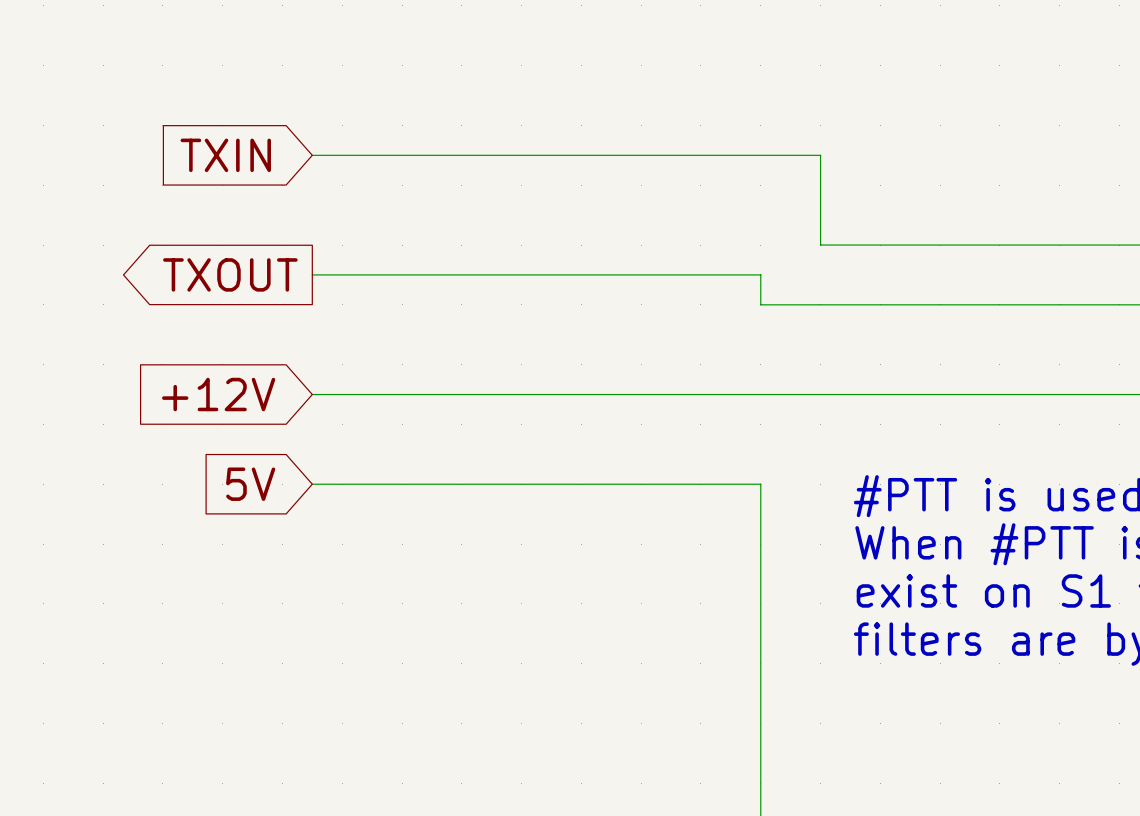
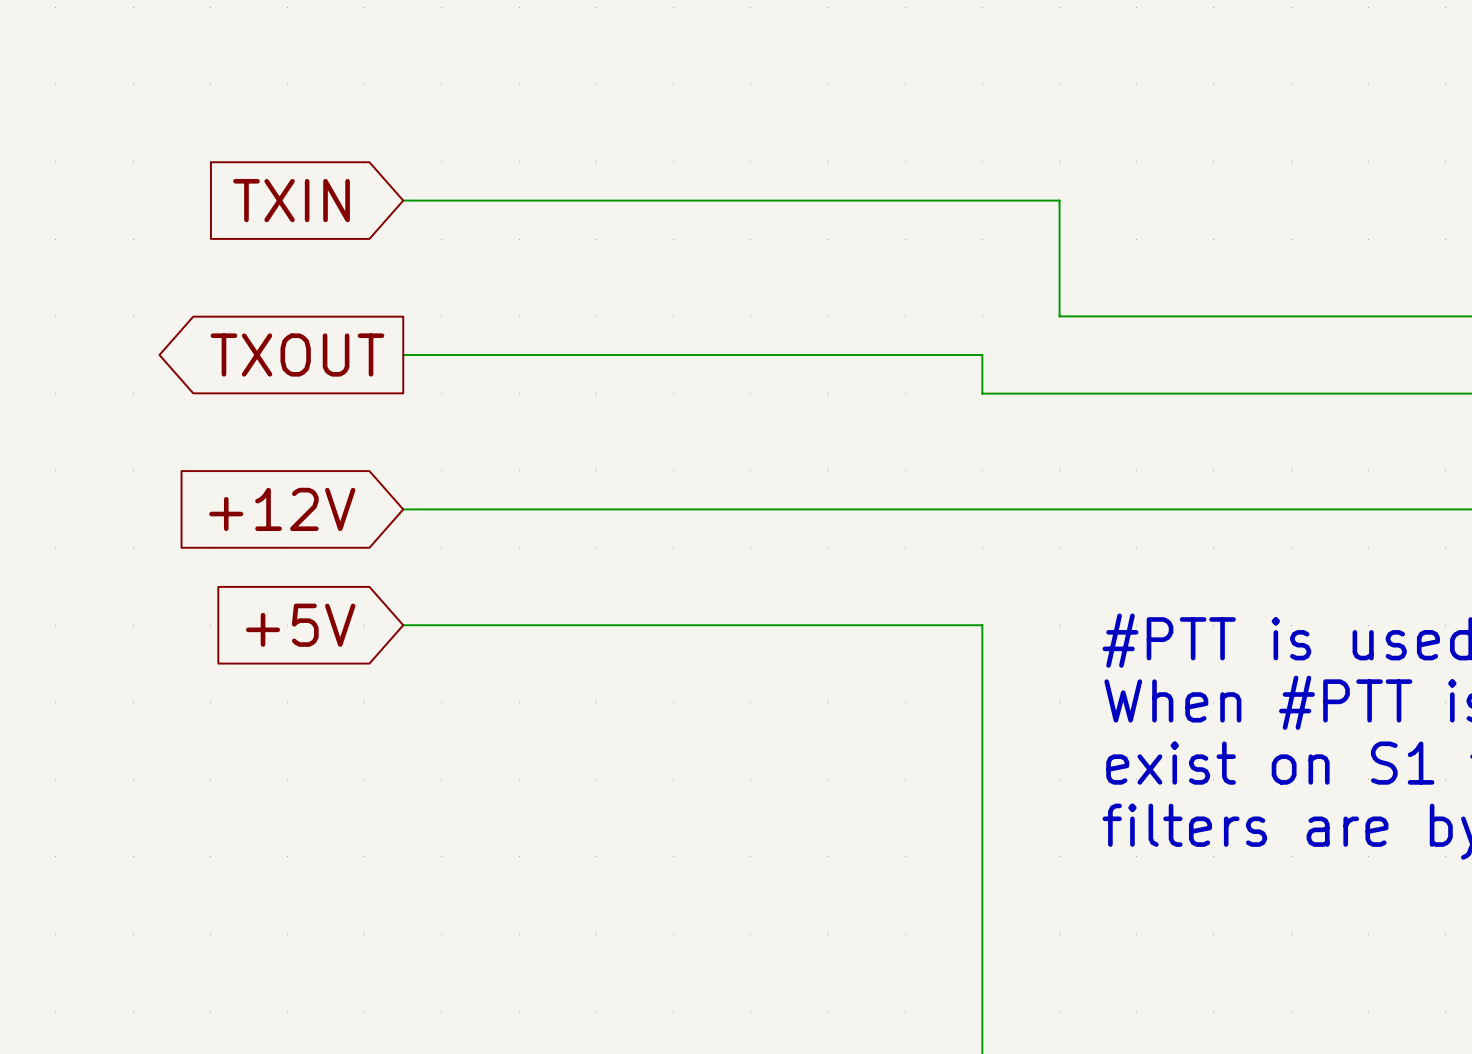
global label: 5V (250, 484) -> +5V (300, 625)

